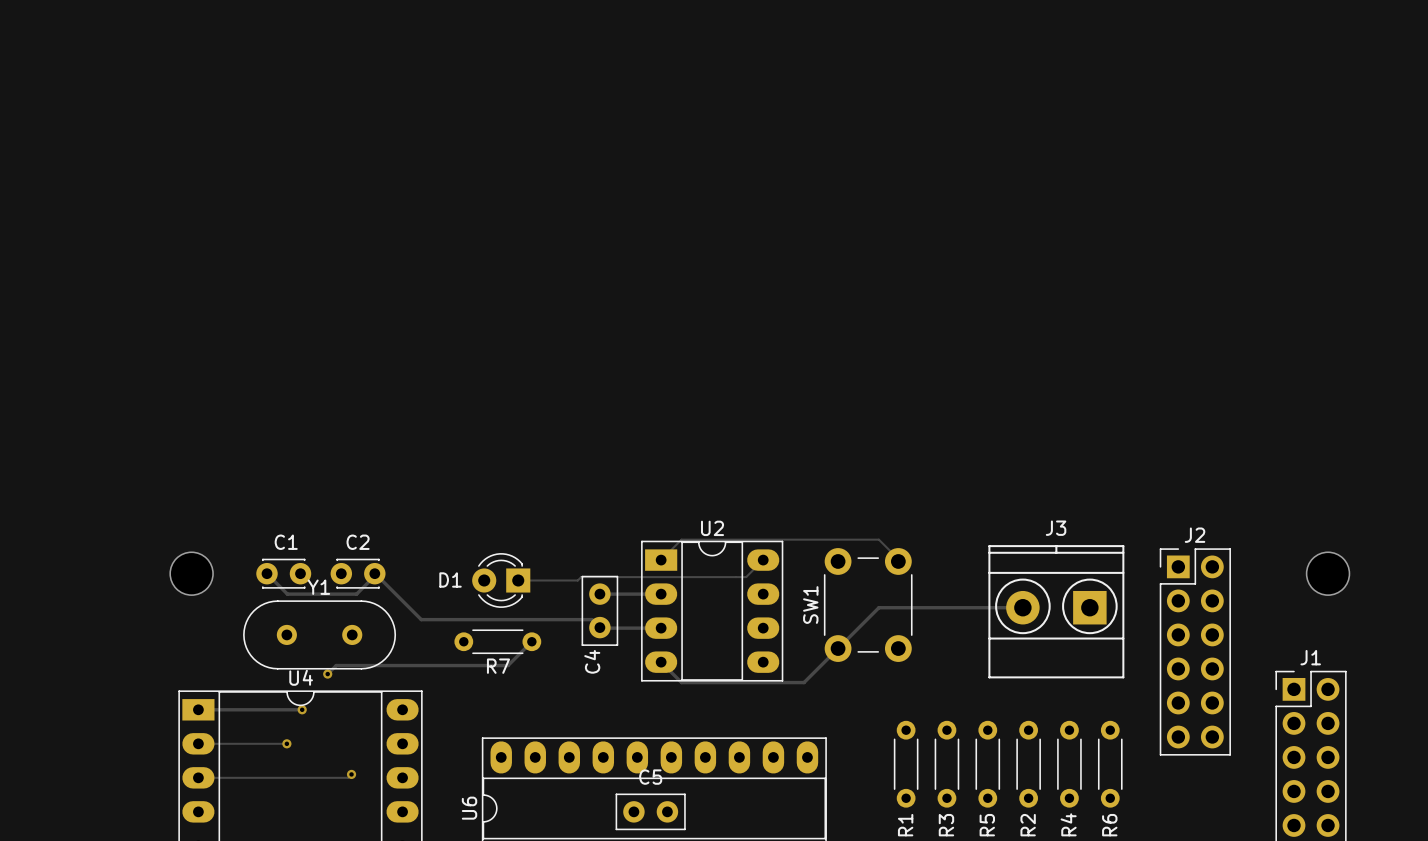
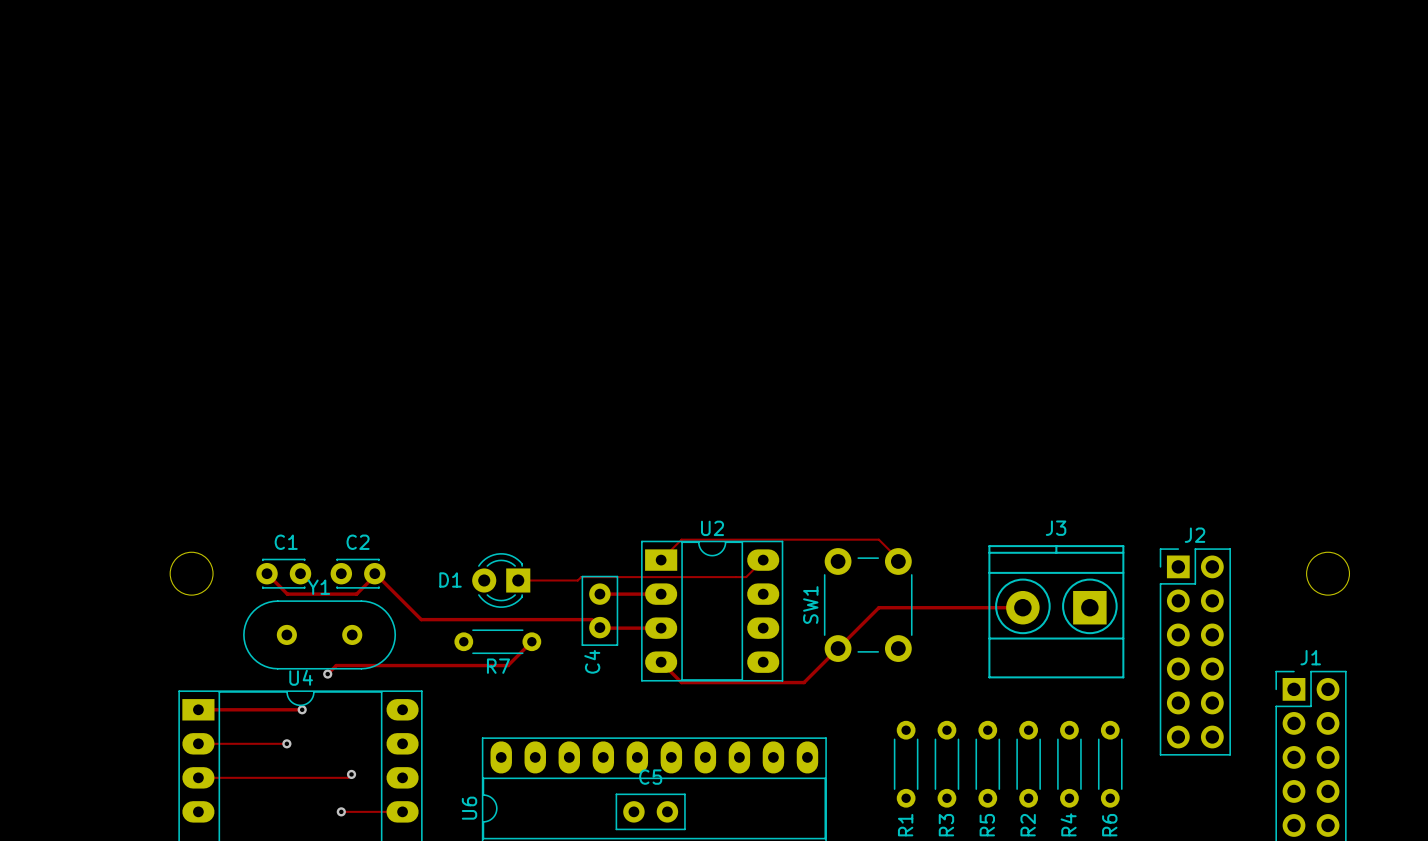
track: none -> (341, 811) (402, 811)
via: none -> (341, 811)

